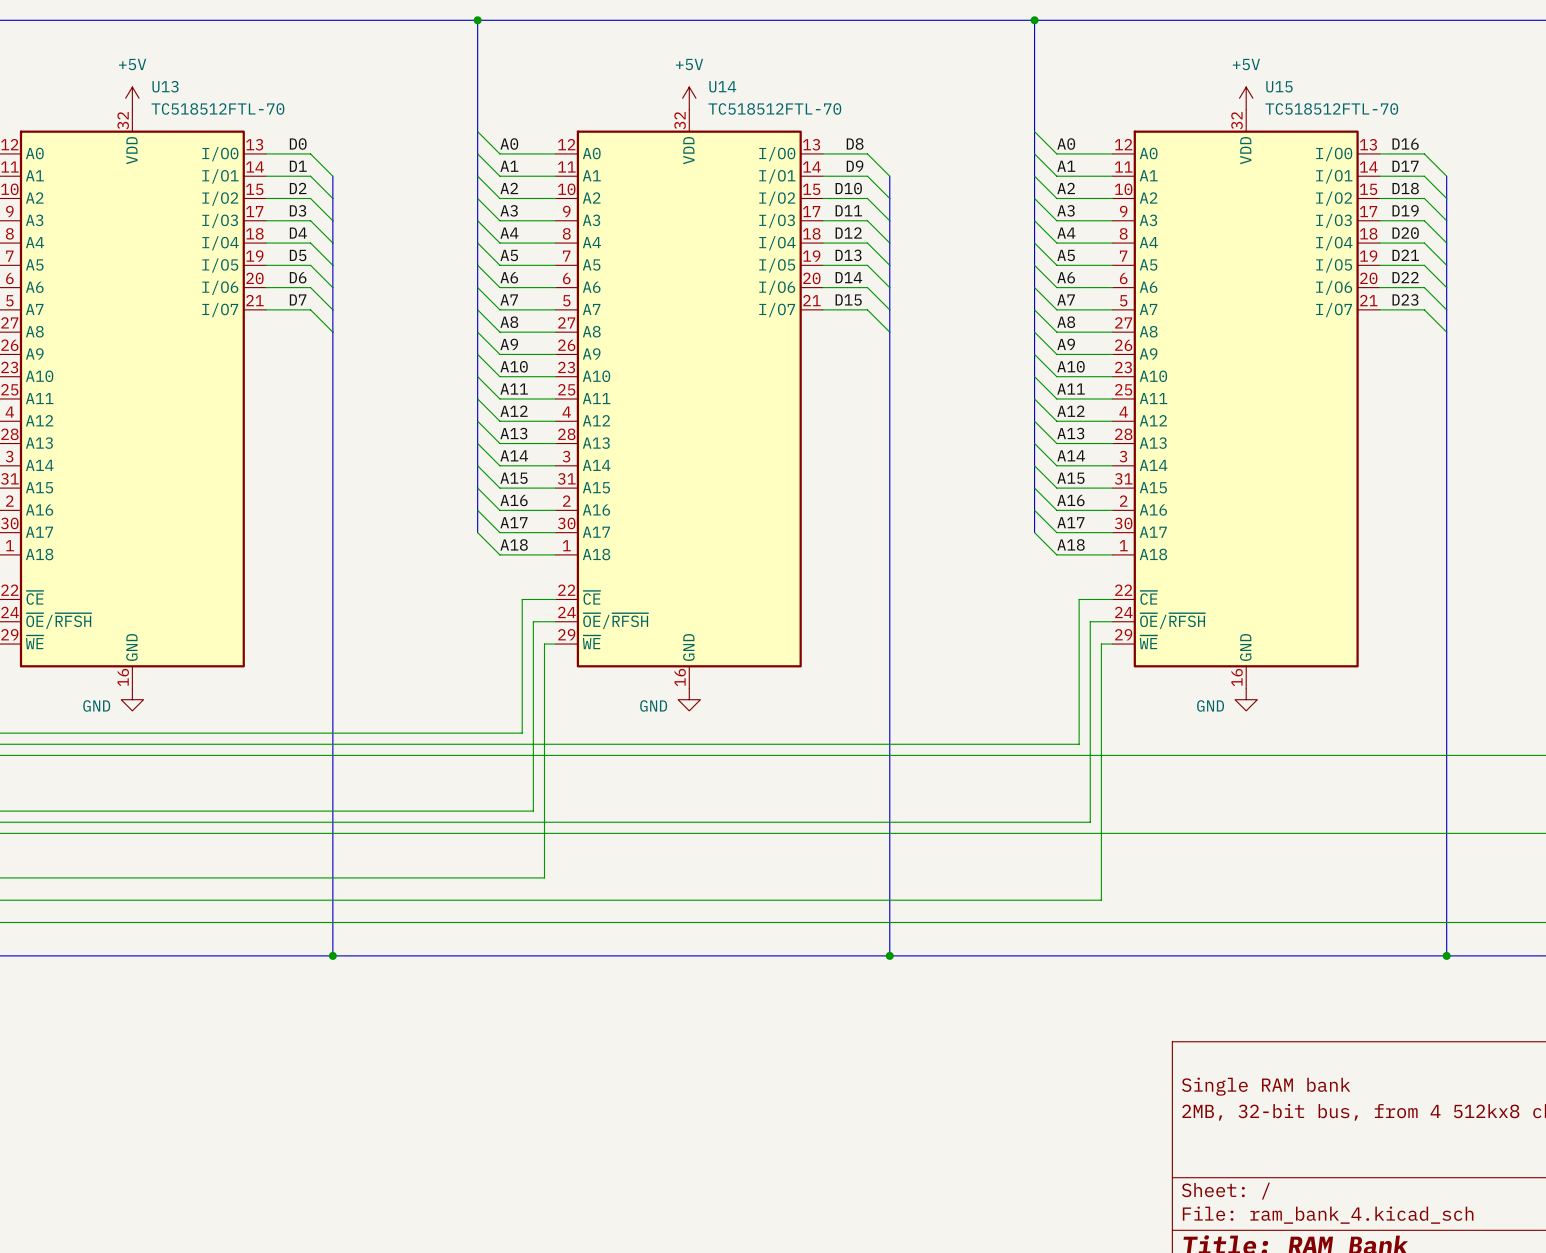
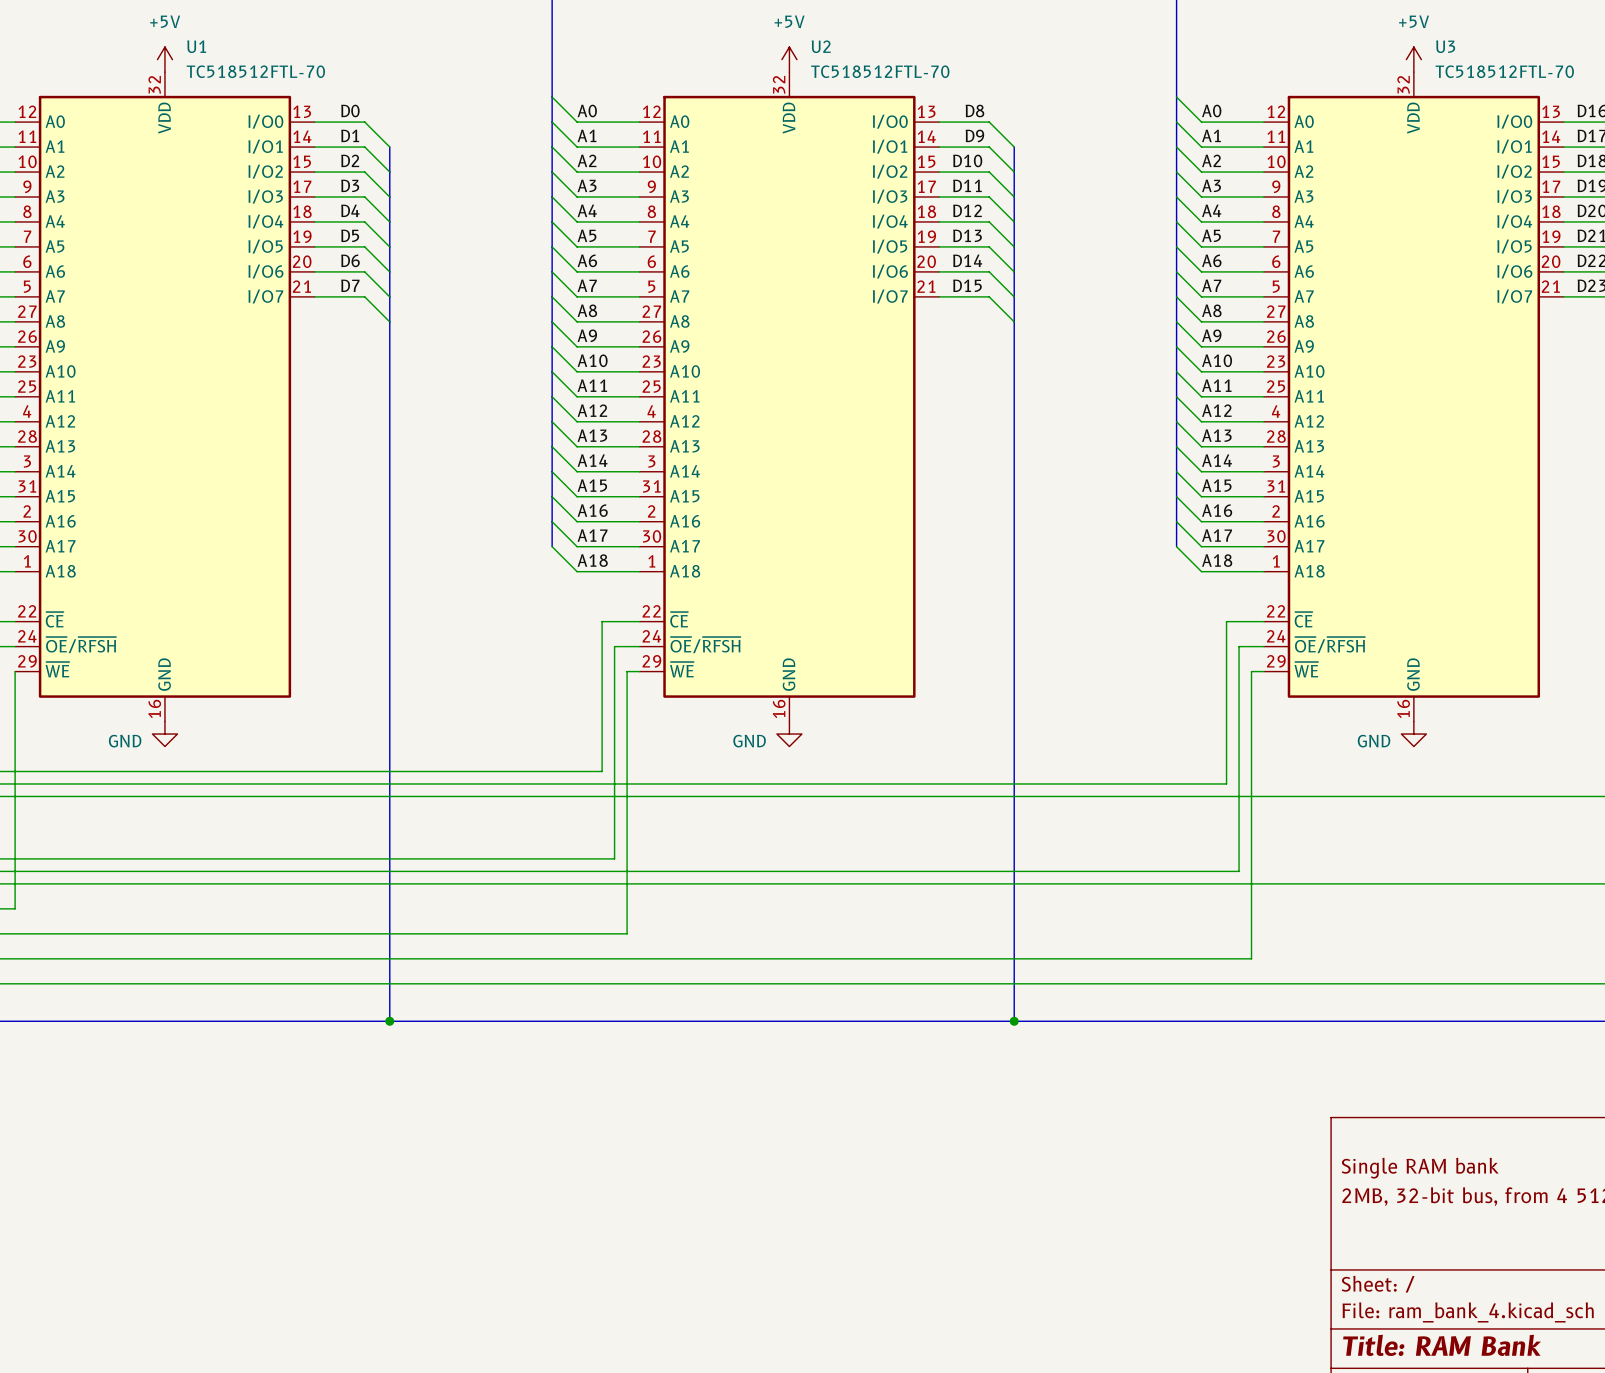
U13 name: U13 (165, 86) -> U1 (196, 46)
U14 name: U14 (722, 86) -> U2 (821, 46)
U15 name: U15 (1279, 86) -> U3 (1445, 46)

